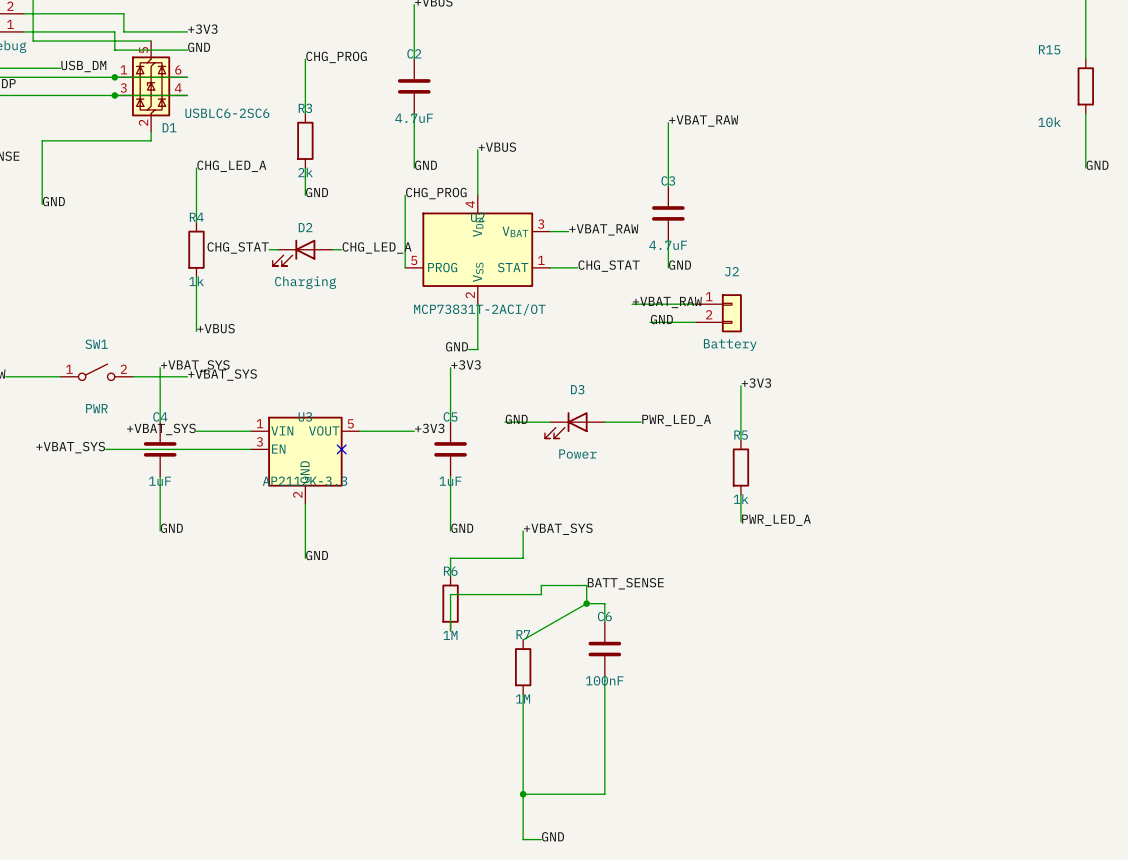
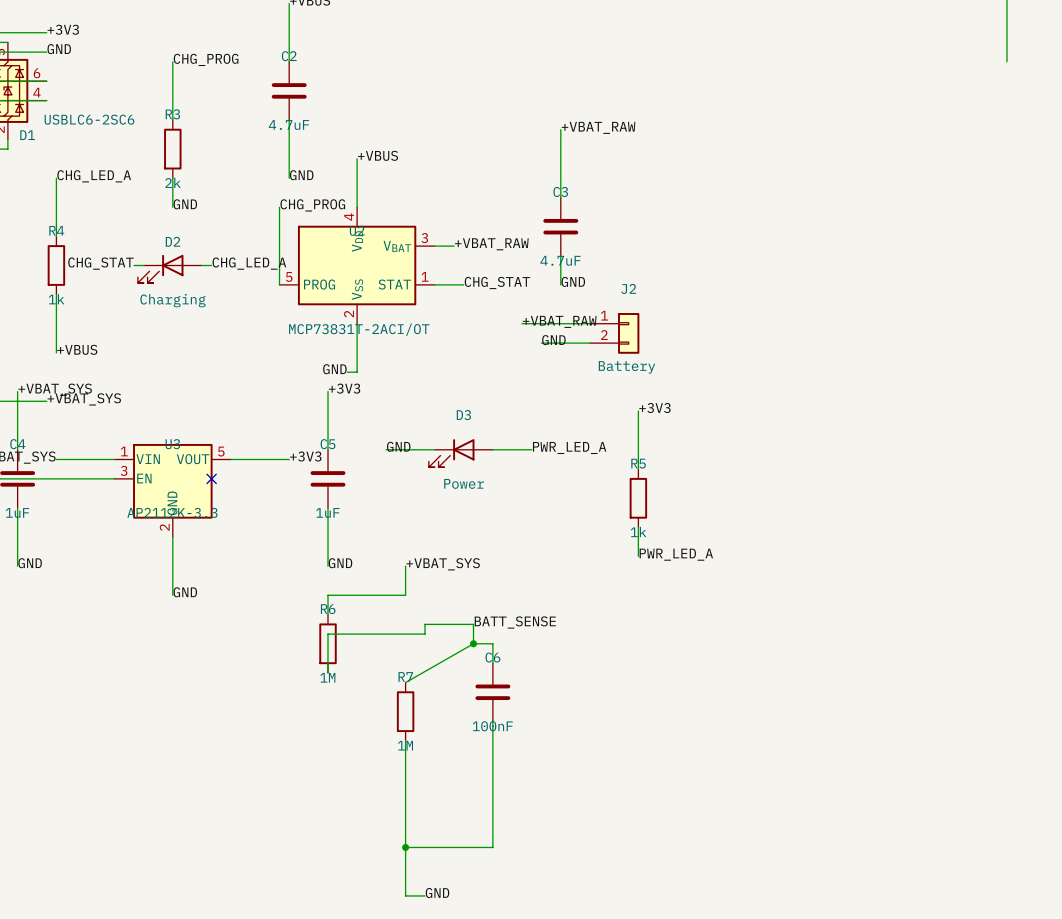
R15: 10k (1085, 86) -> none
wire: (1085, 113) (1085, 168) -> none
label: GND (1097, 165) -> none

